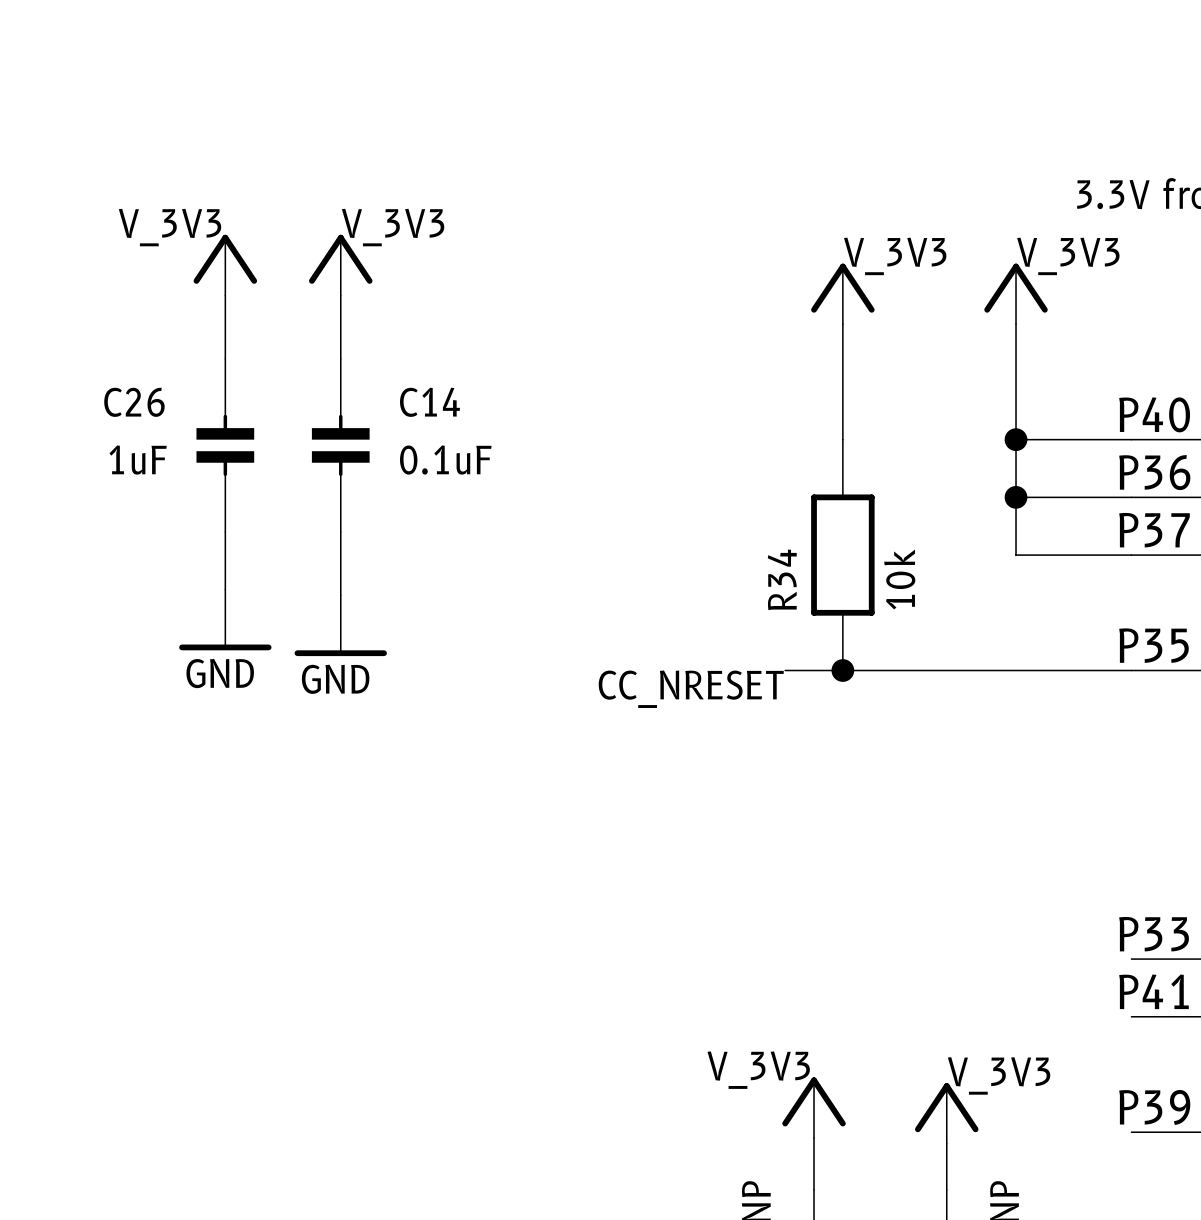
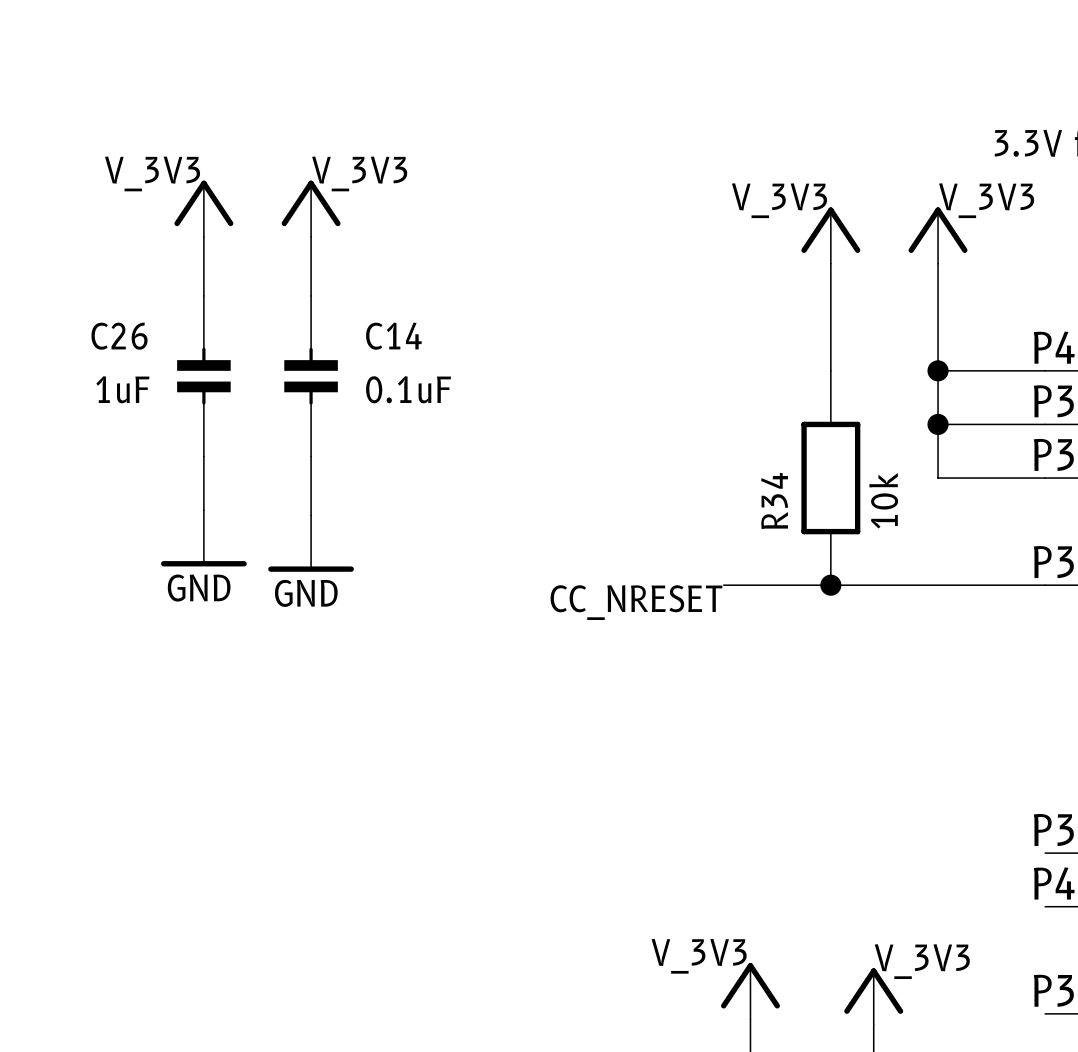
label position: V_3V3 (895, 256) -> V_3V3 (779, 200)
power symbol position: (842, 293) -> (830, 235)
wire: (842, 324) (842, 439) -> (830, 263) (830, 370)
R34 position: (842, 555) -> (830, 478)
junction position: (842, 670) -> (830, 585)

